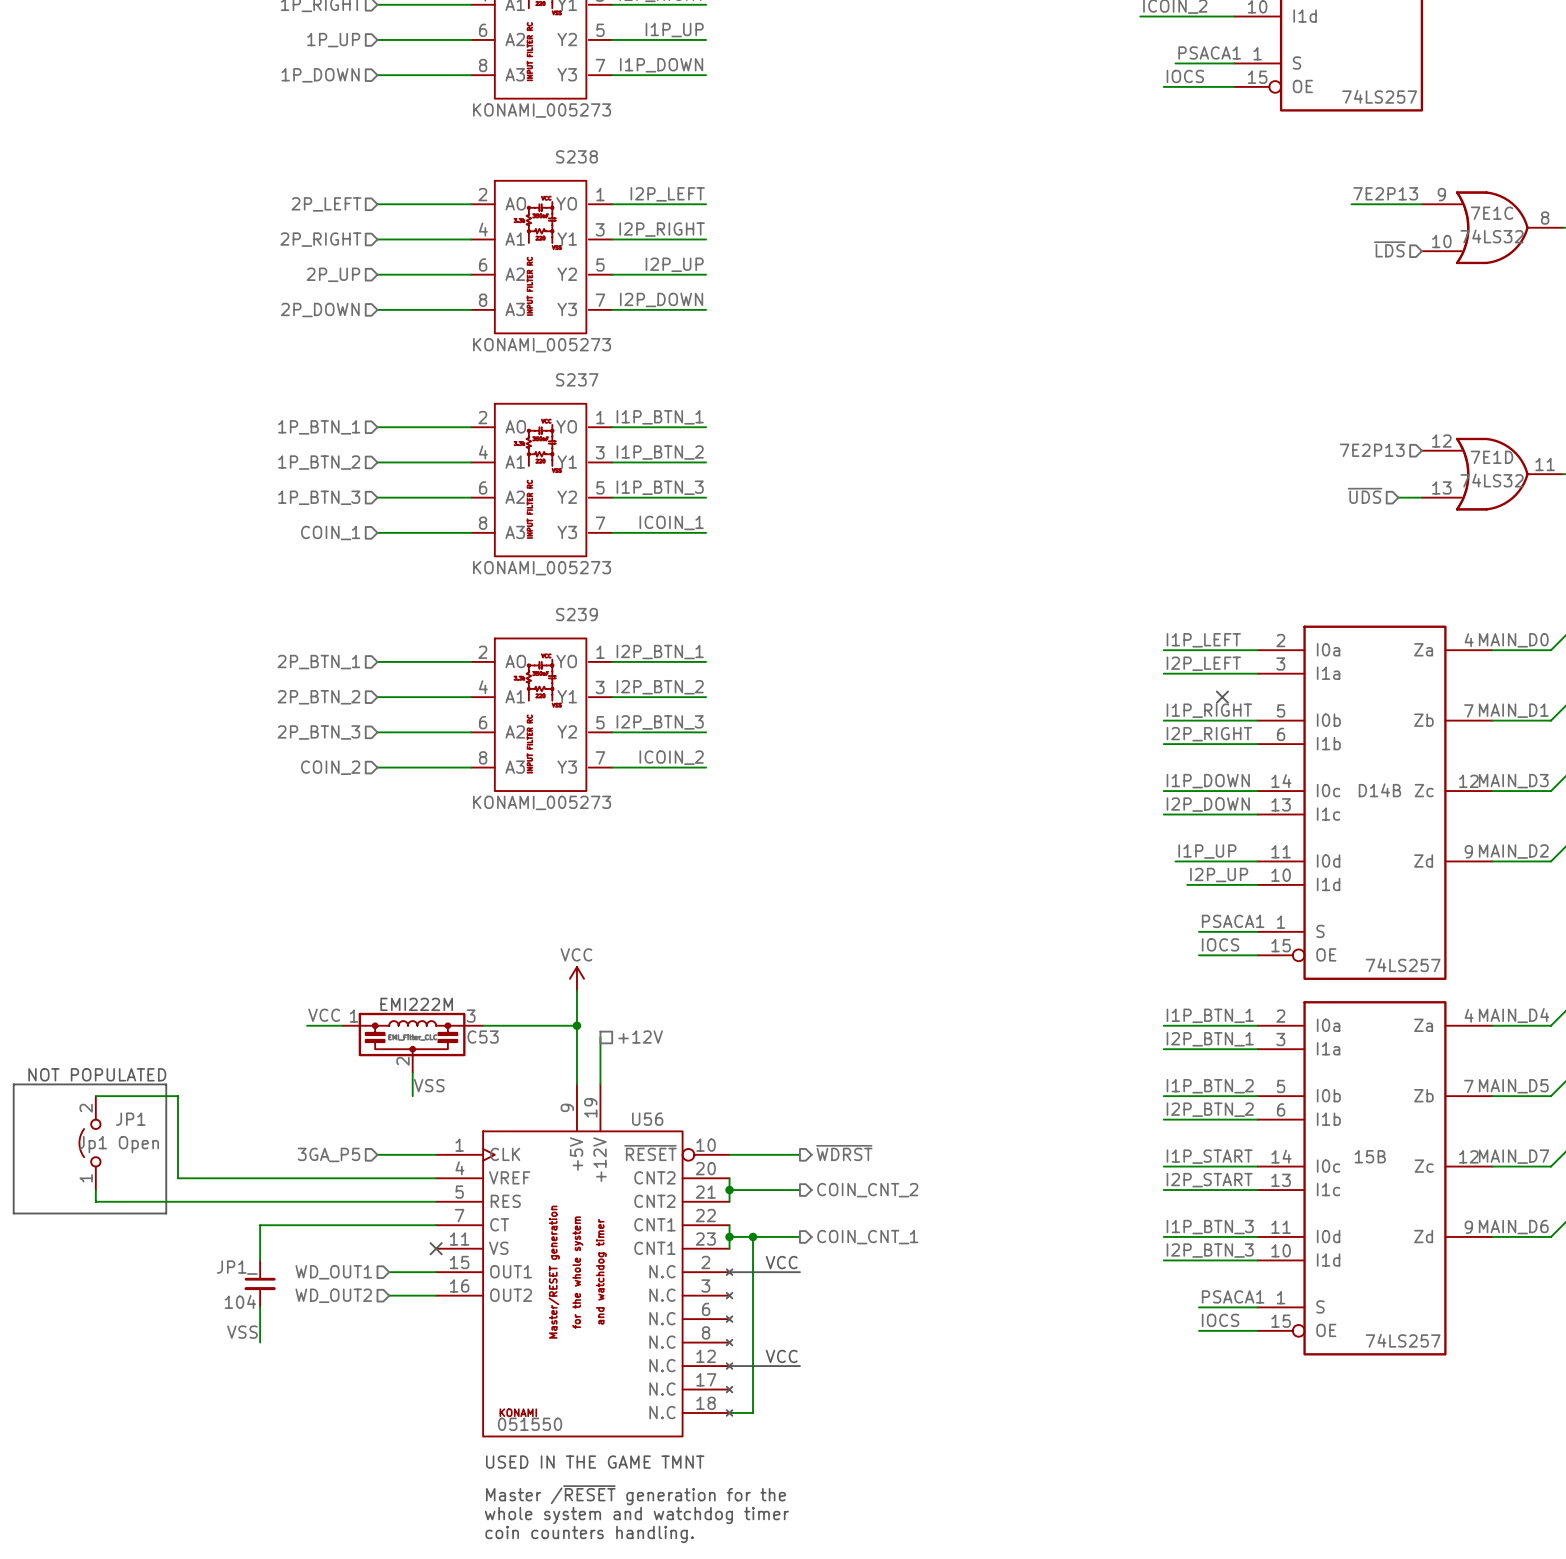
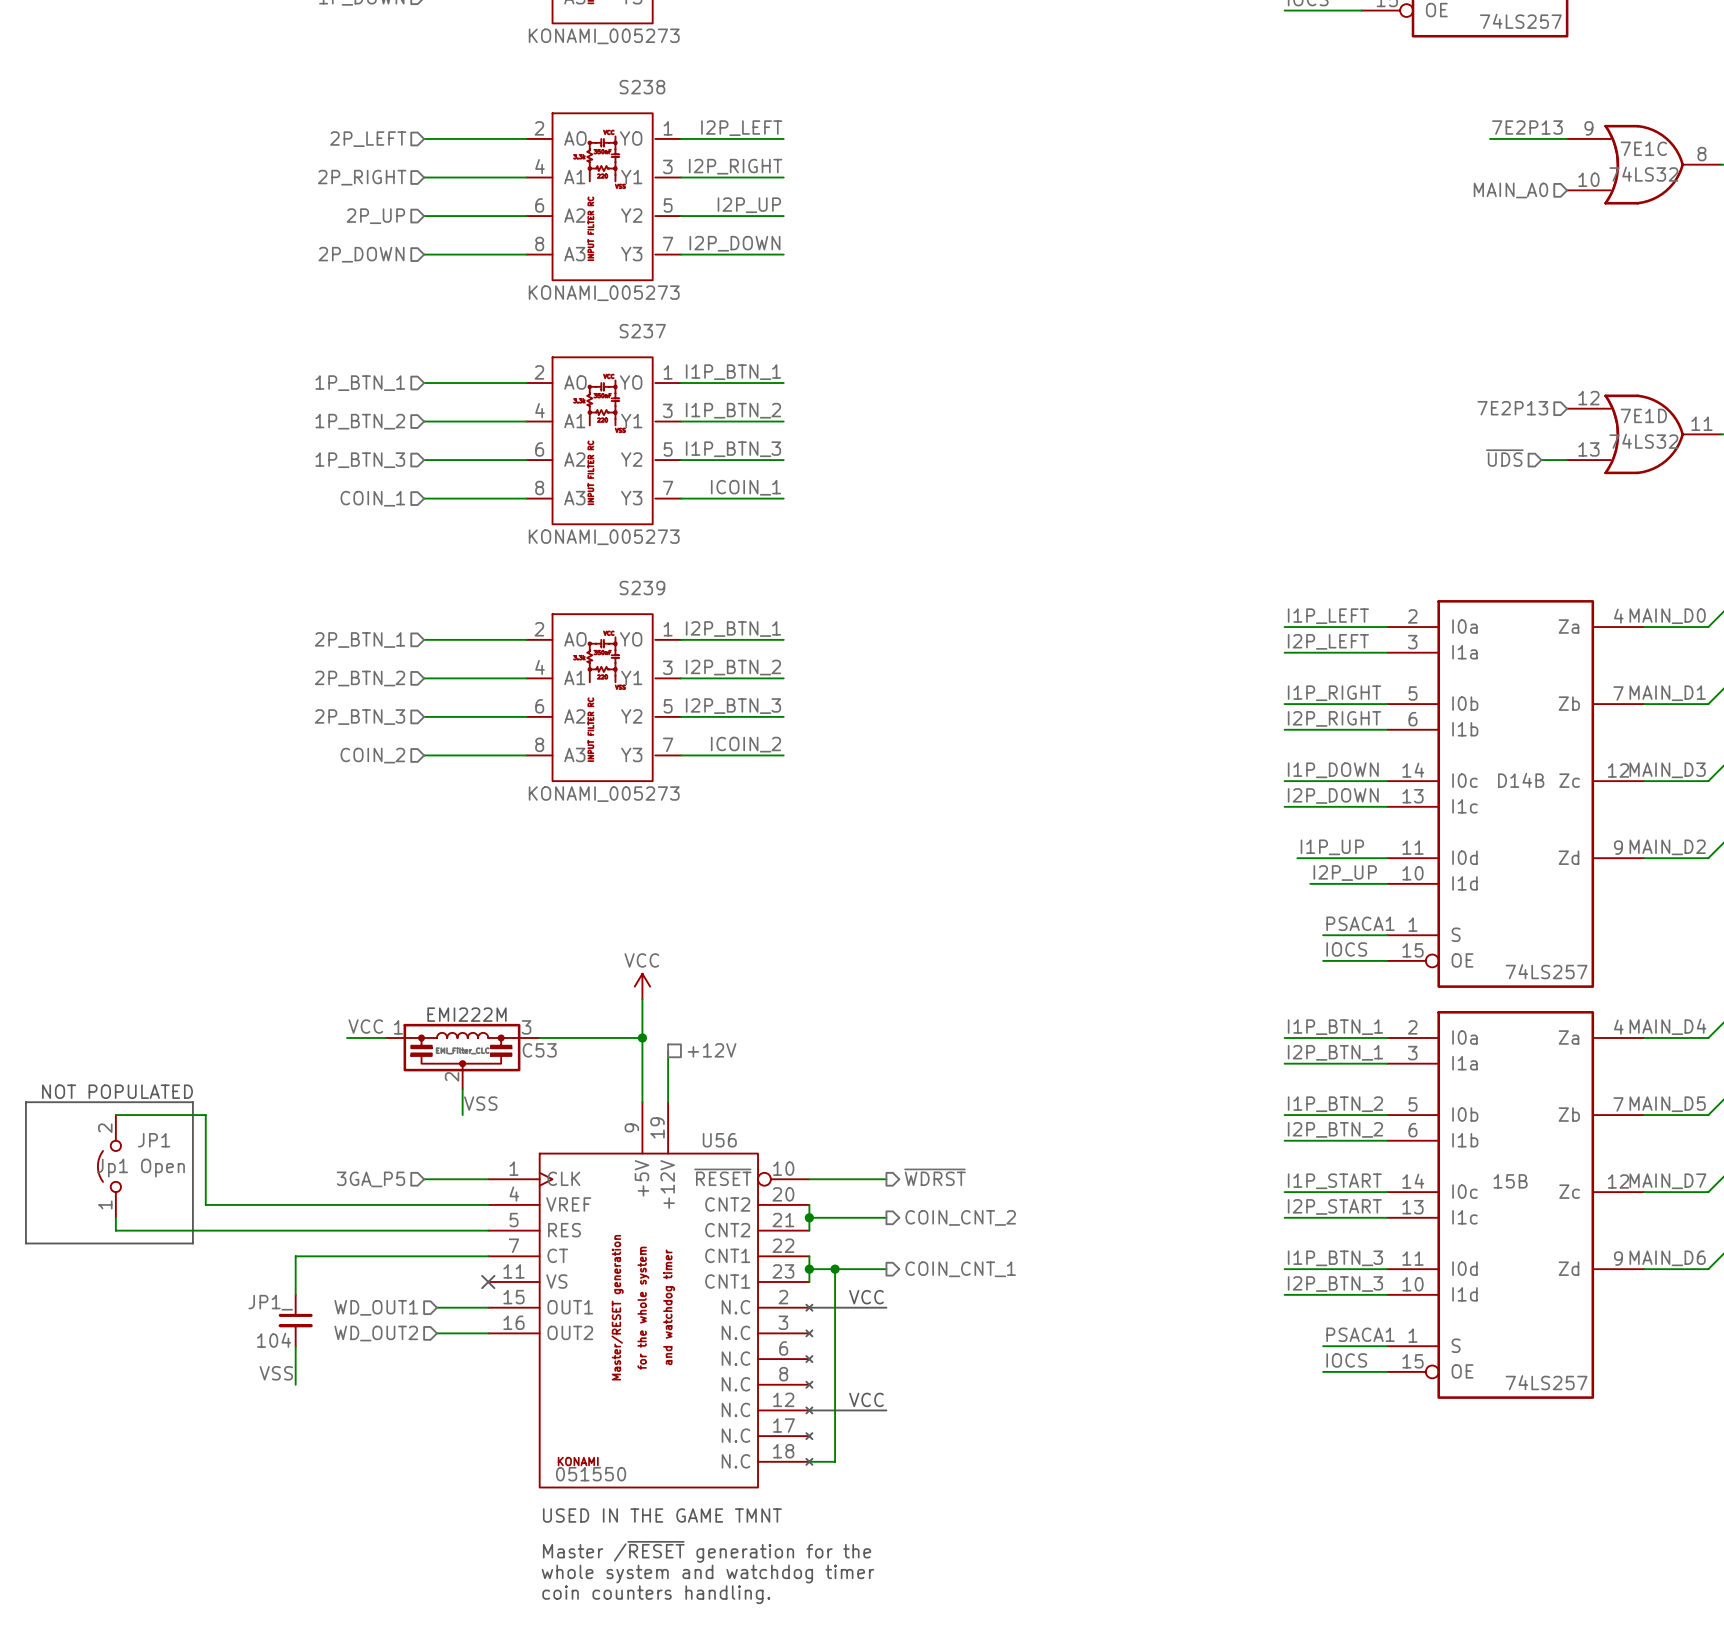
hierarchical label: ~{LDS} (1389, 249) -> MAIN_A0 (1510, 190)
no-connect mark: (1222, 697) -> none

